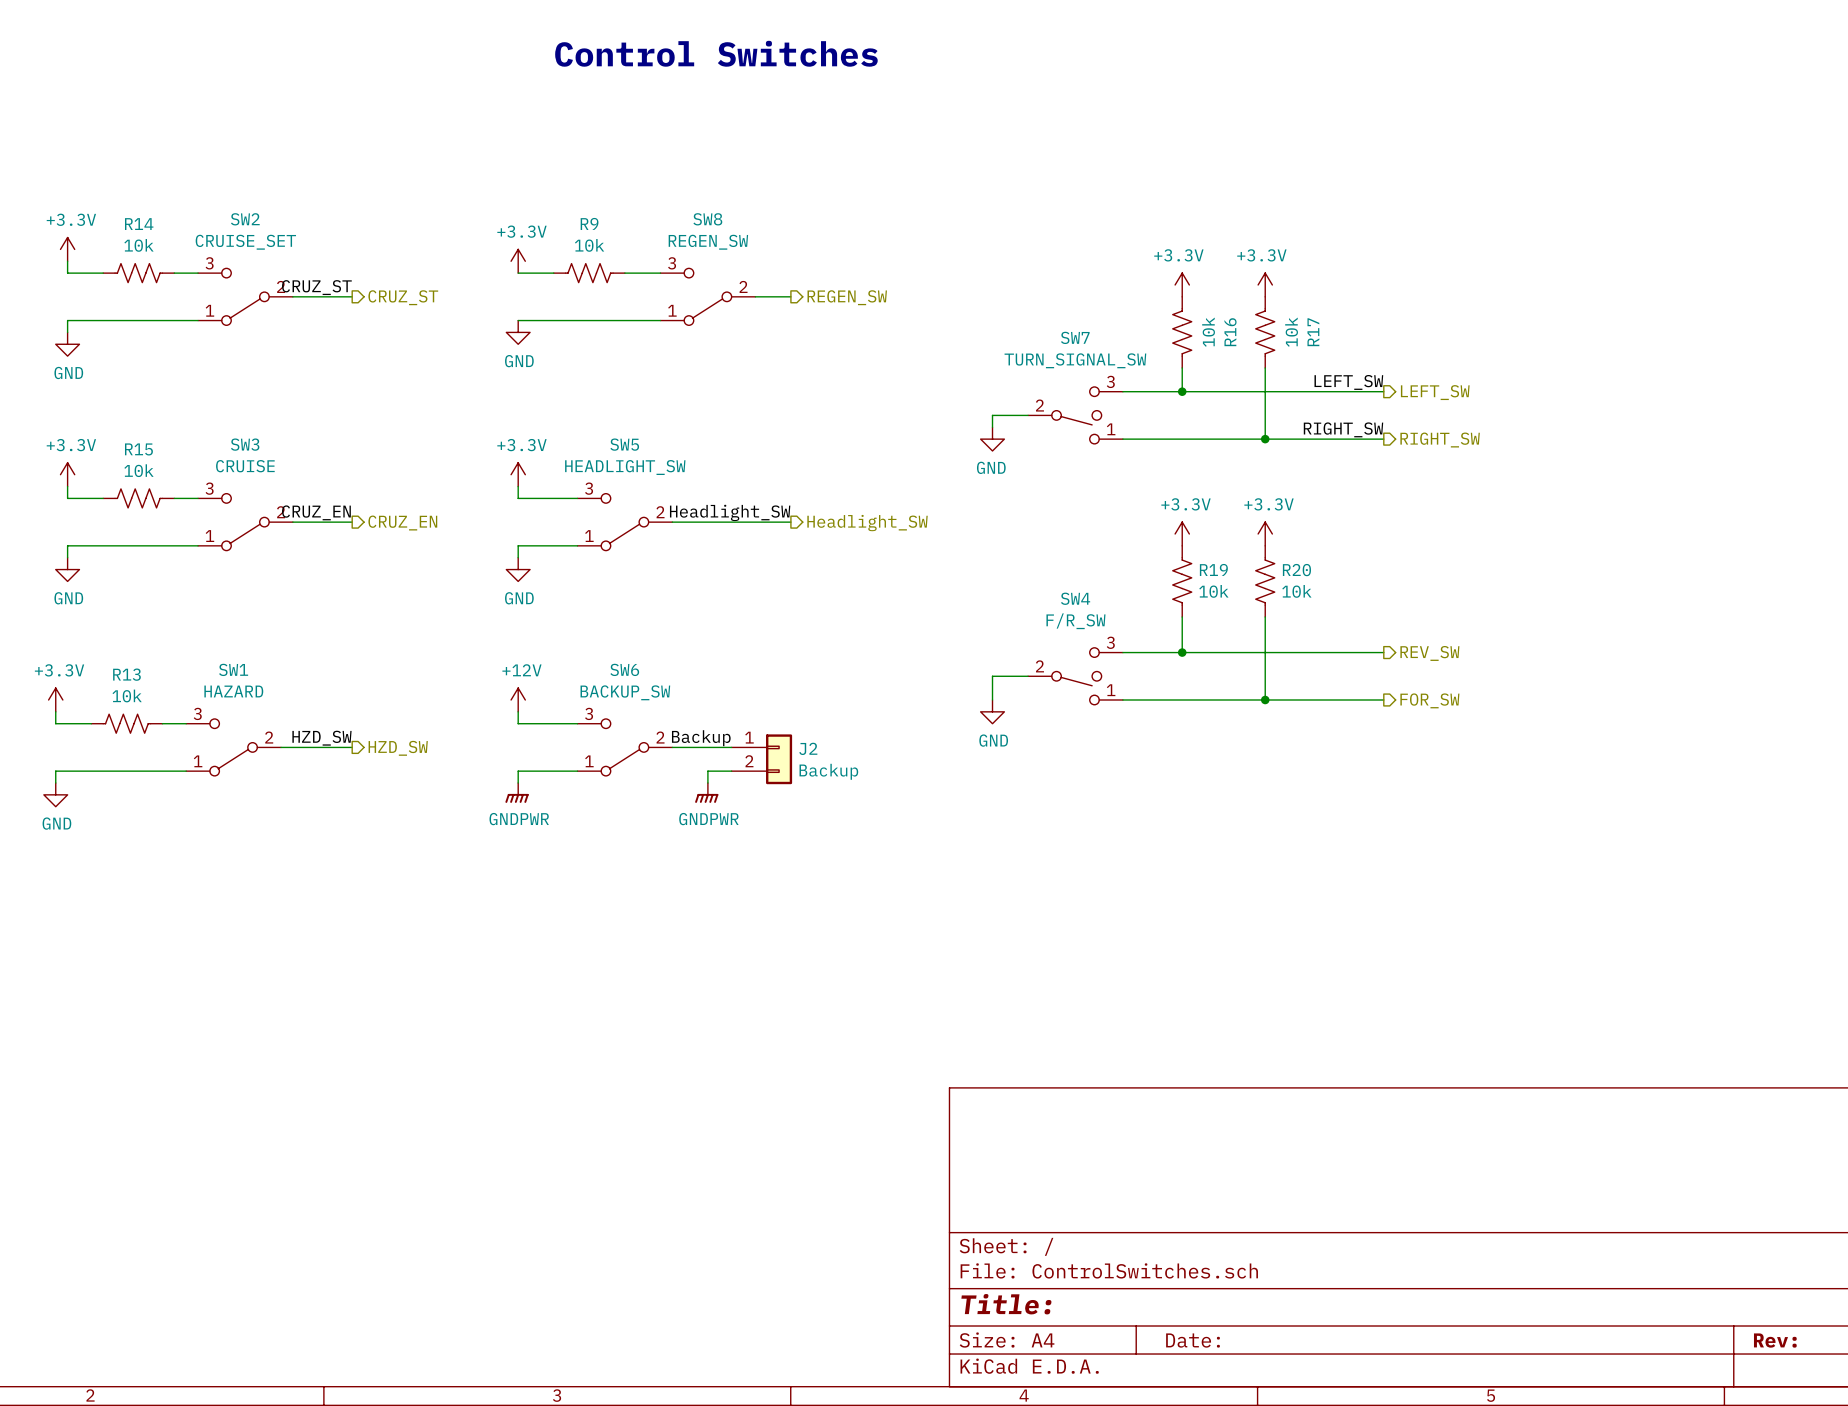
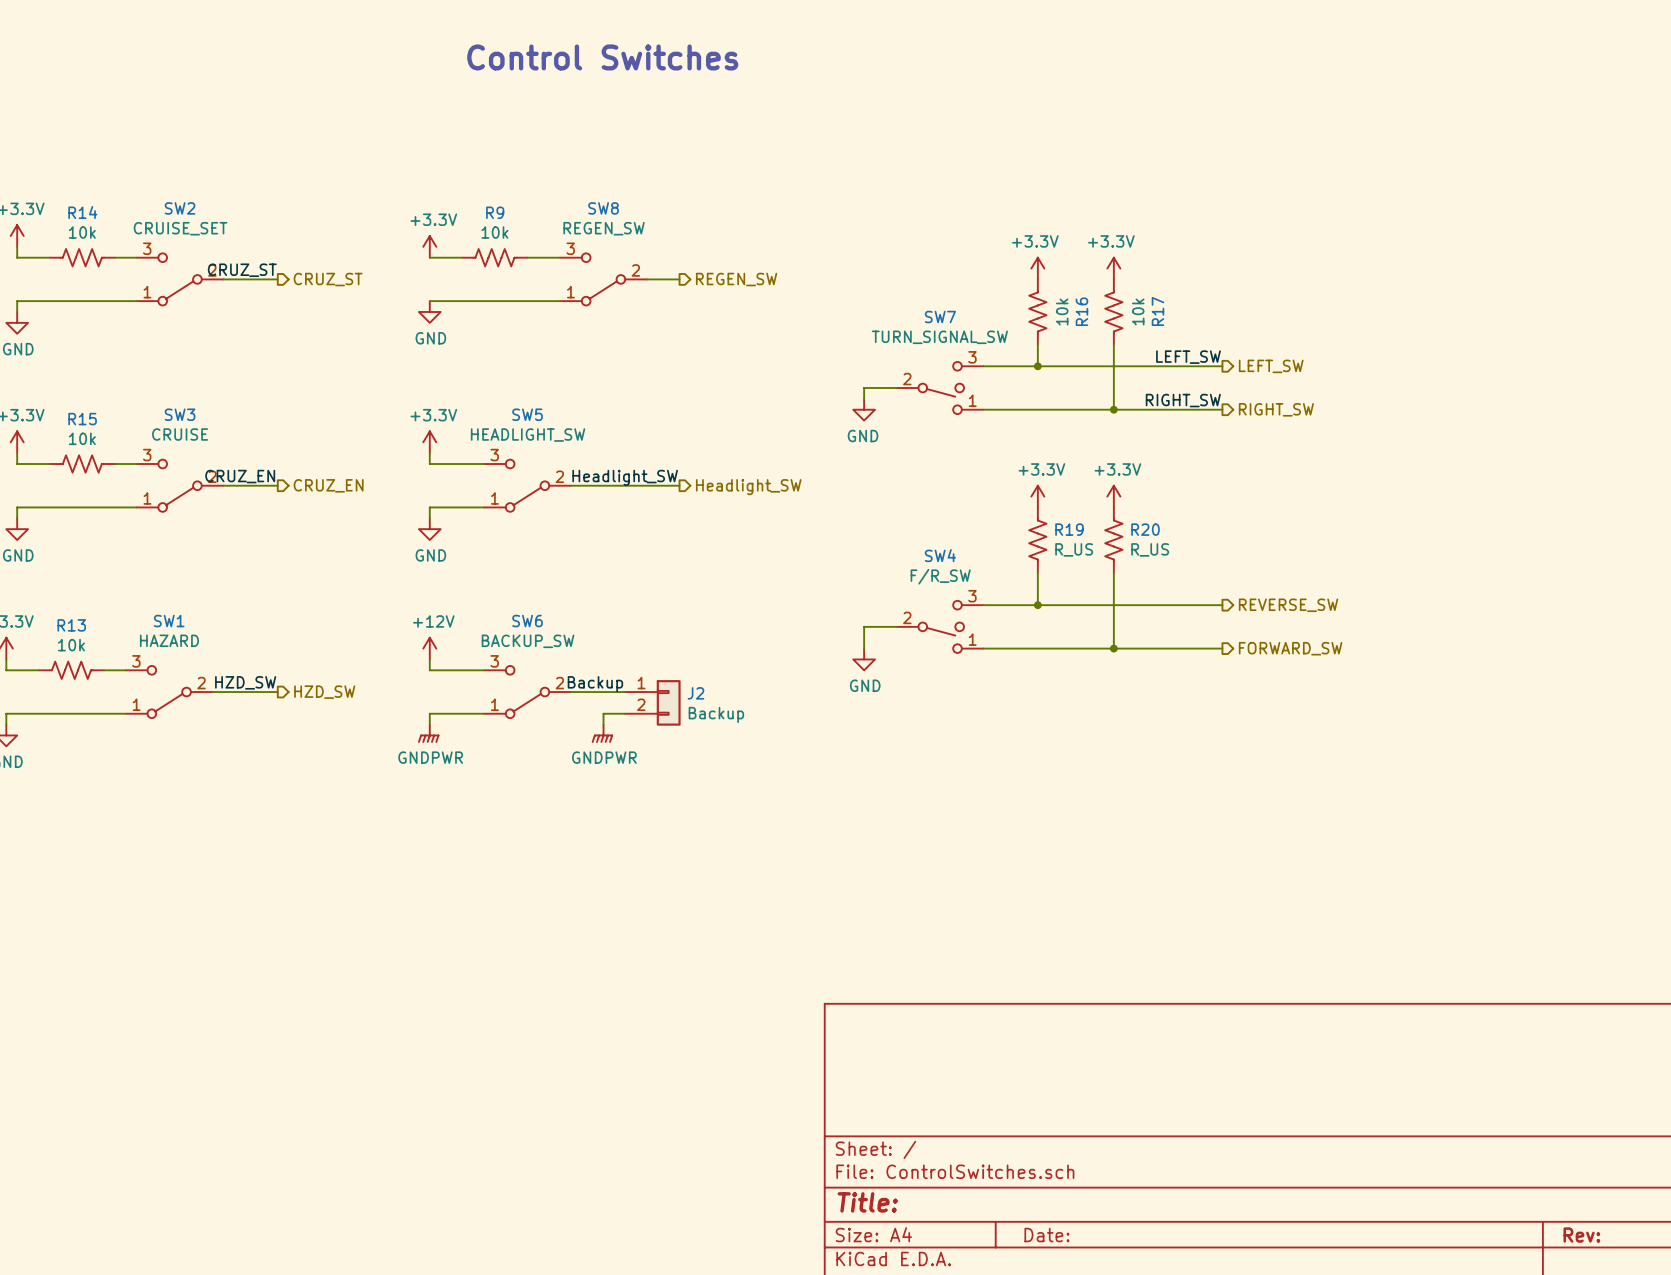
R19 value: 10k (1213, 591) -> R_US (1074, 549)
R20 value: 10k (1296, 591) -> R_US (1150, 549)
hierarchical label: REV_SW (1429, 653) -> REVERSE_SW (1288, 605)
hierarchical label: FOR_SW (1429, 700) -> FORWARD_SW (1290, 648)

